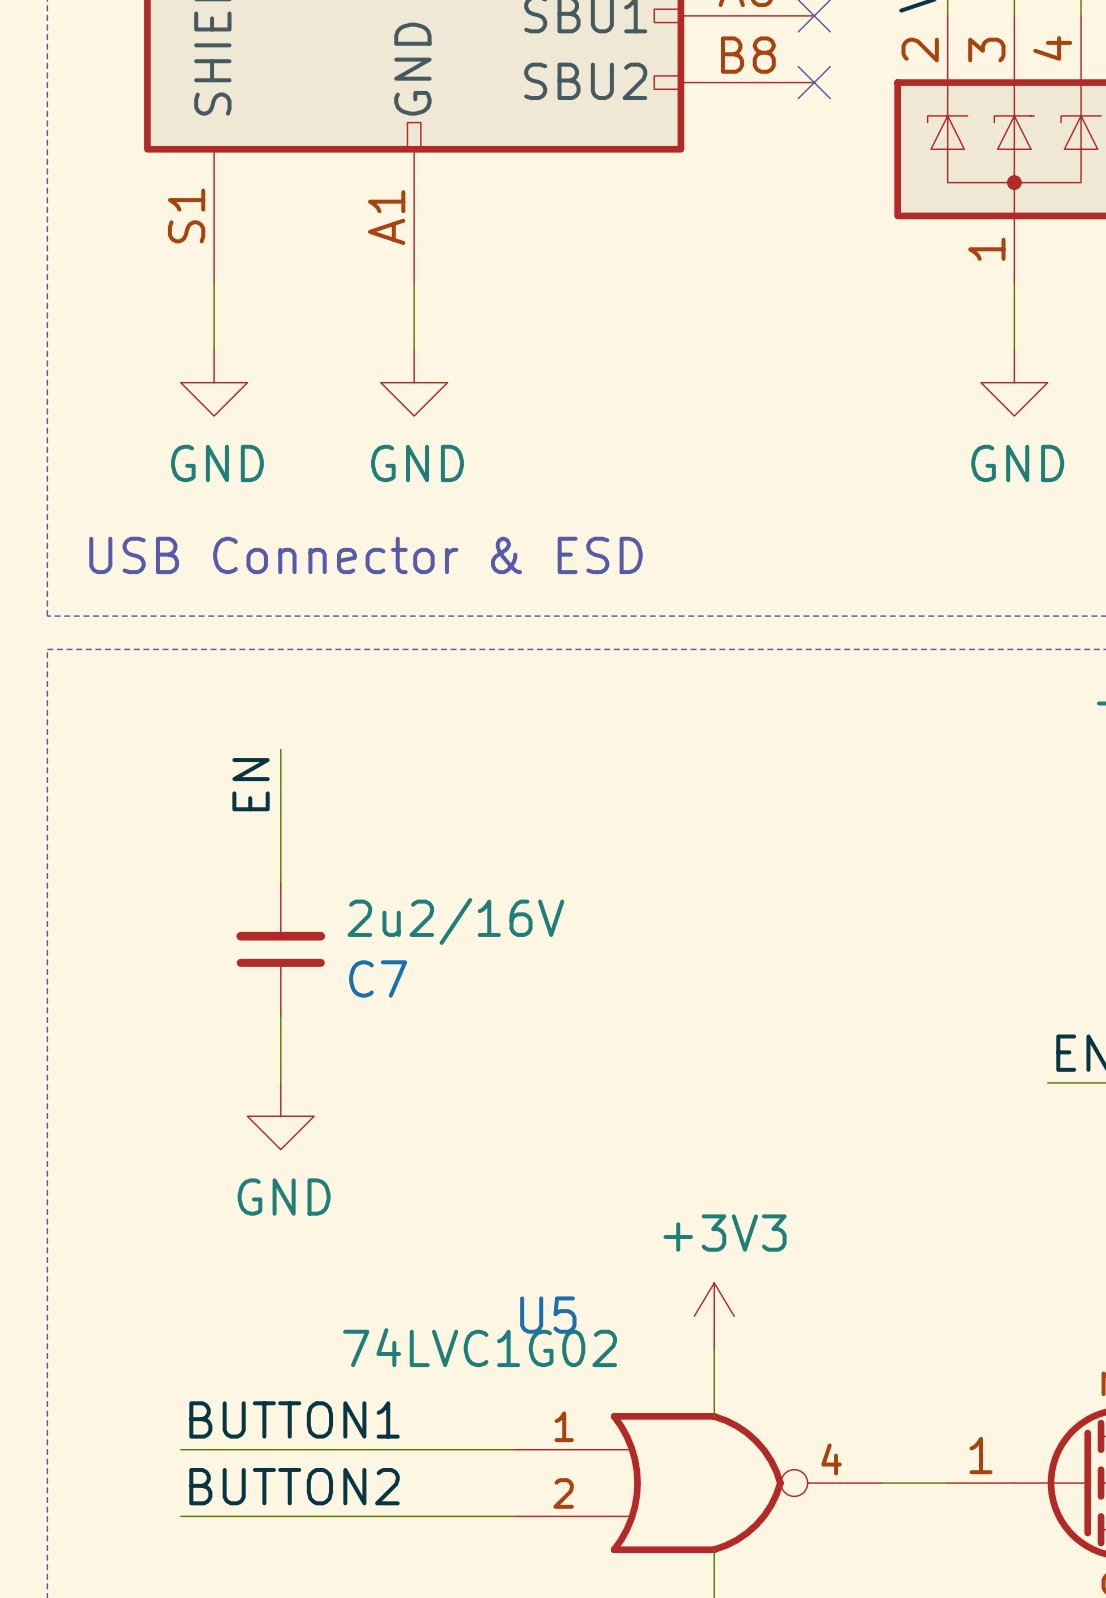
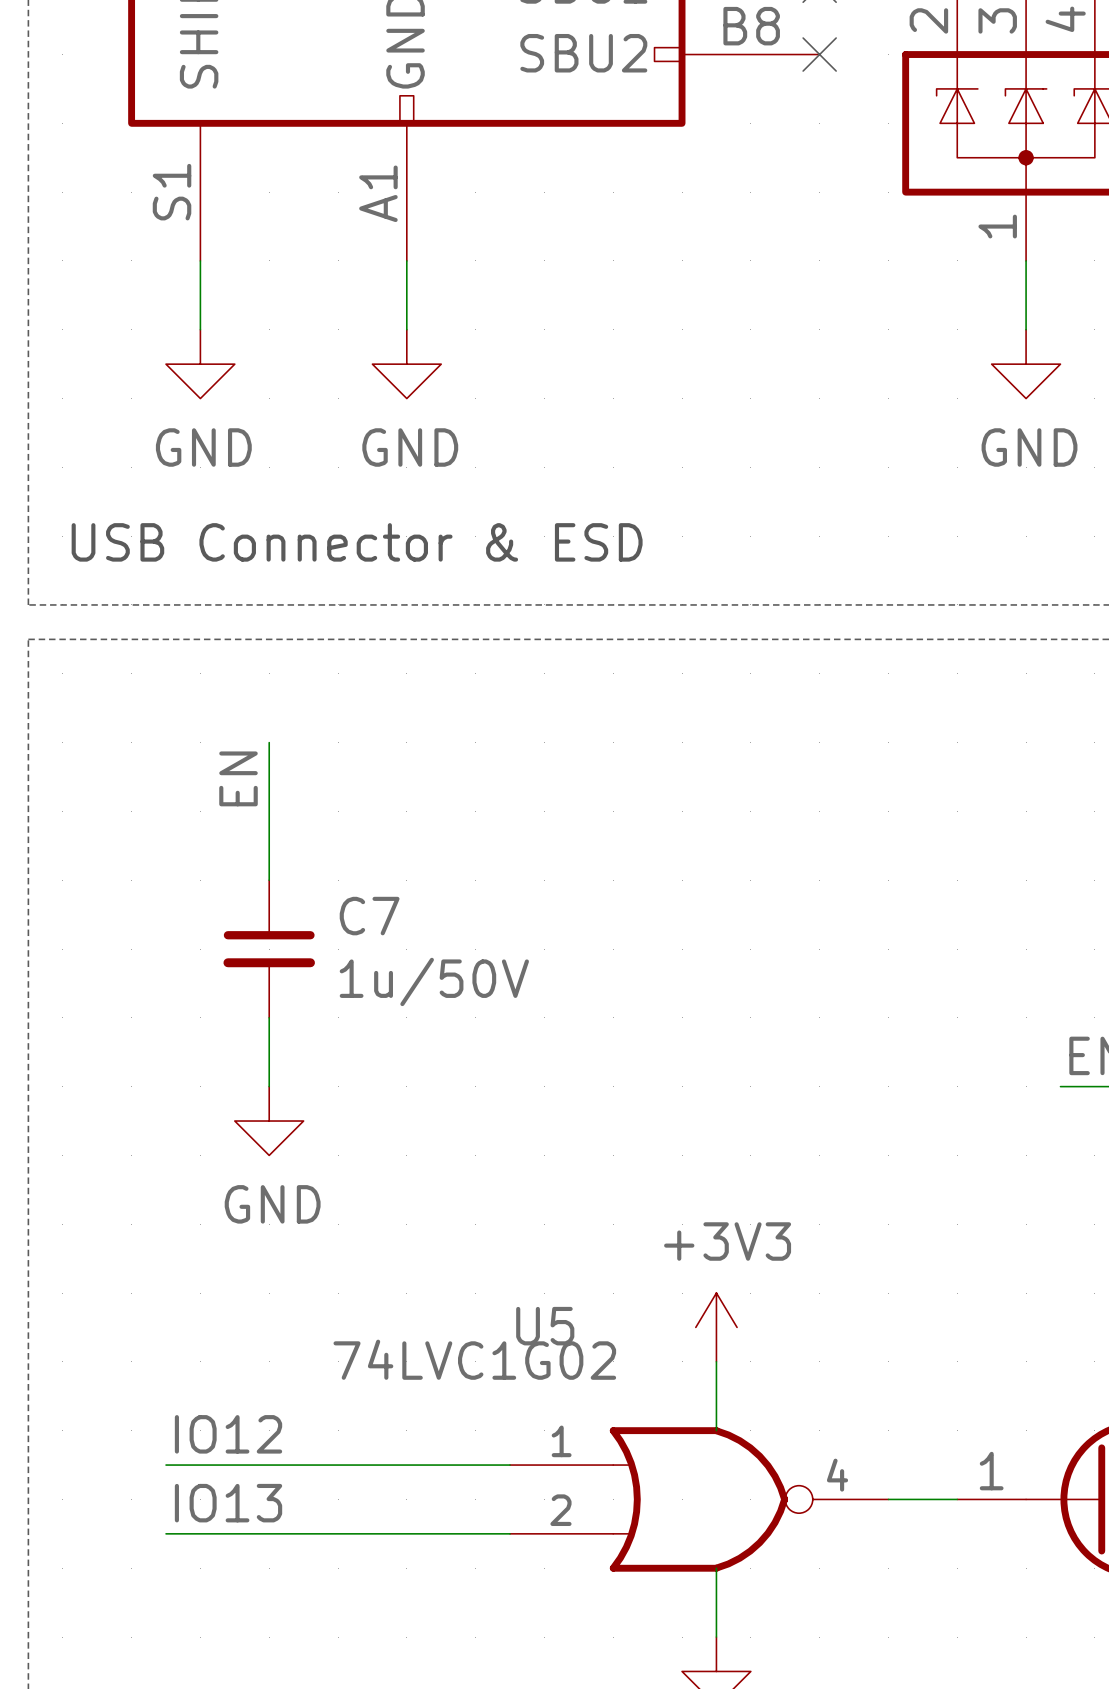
C7 value: 2u2/16V (455, 921) -> 1u/50V (434, 981)
C7 rotation: 0° (280, 949) -> 180° (269, 949)
C7 name position: C7 (378, 978) -> C7 (369, 916)
label: BUTTON1 (294, 1419) -> IO12 (228, 1434)
label: BUTTON2 (294, 1486) -> IO13 (228, 1503)

